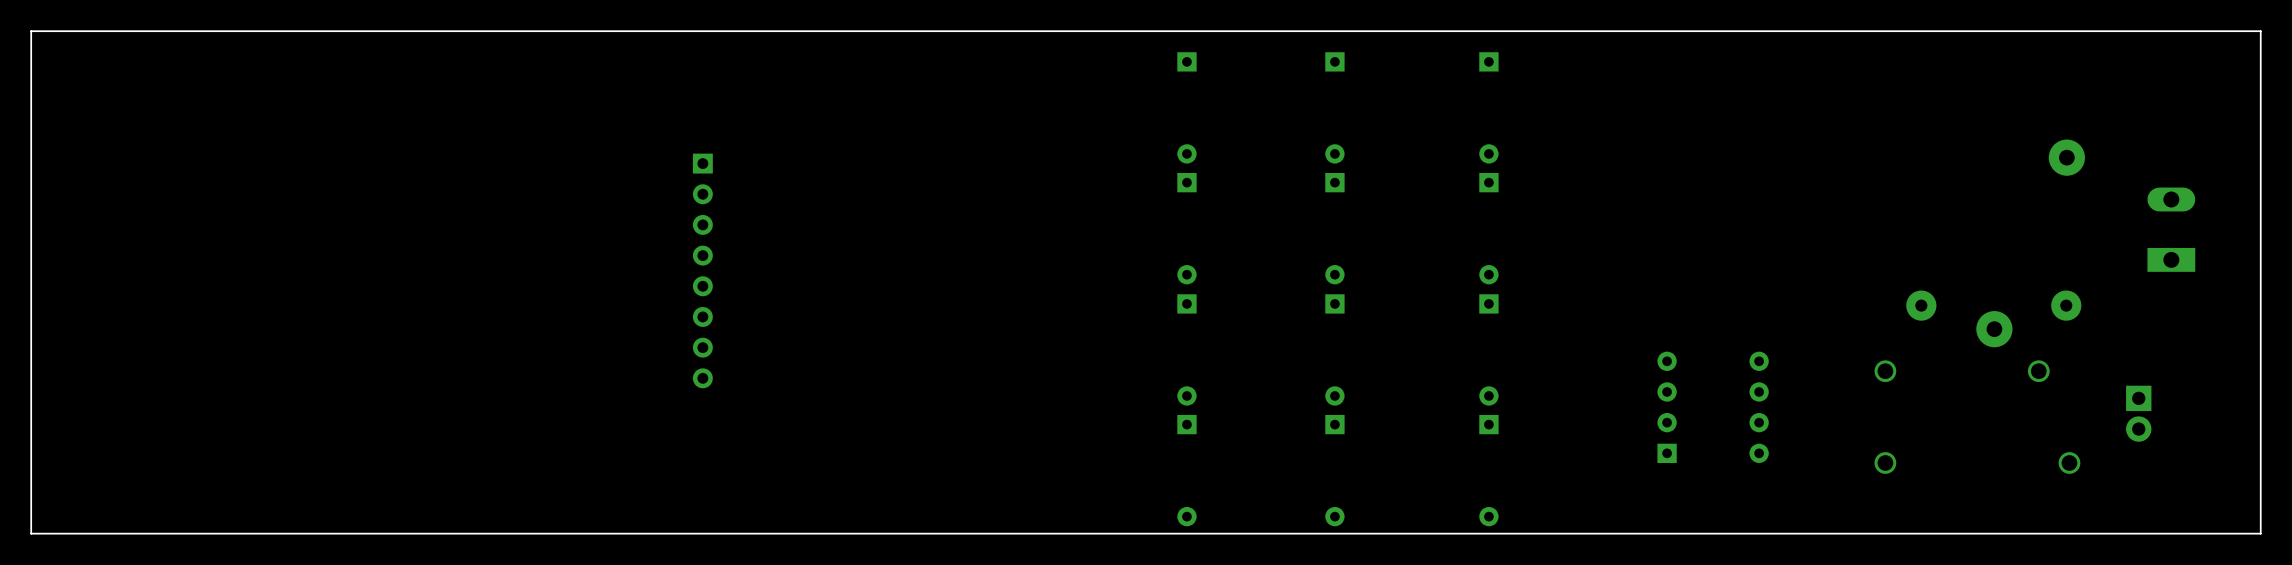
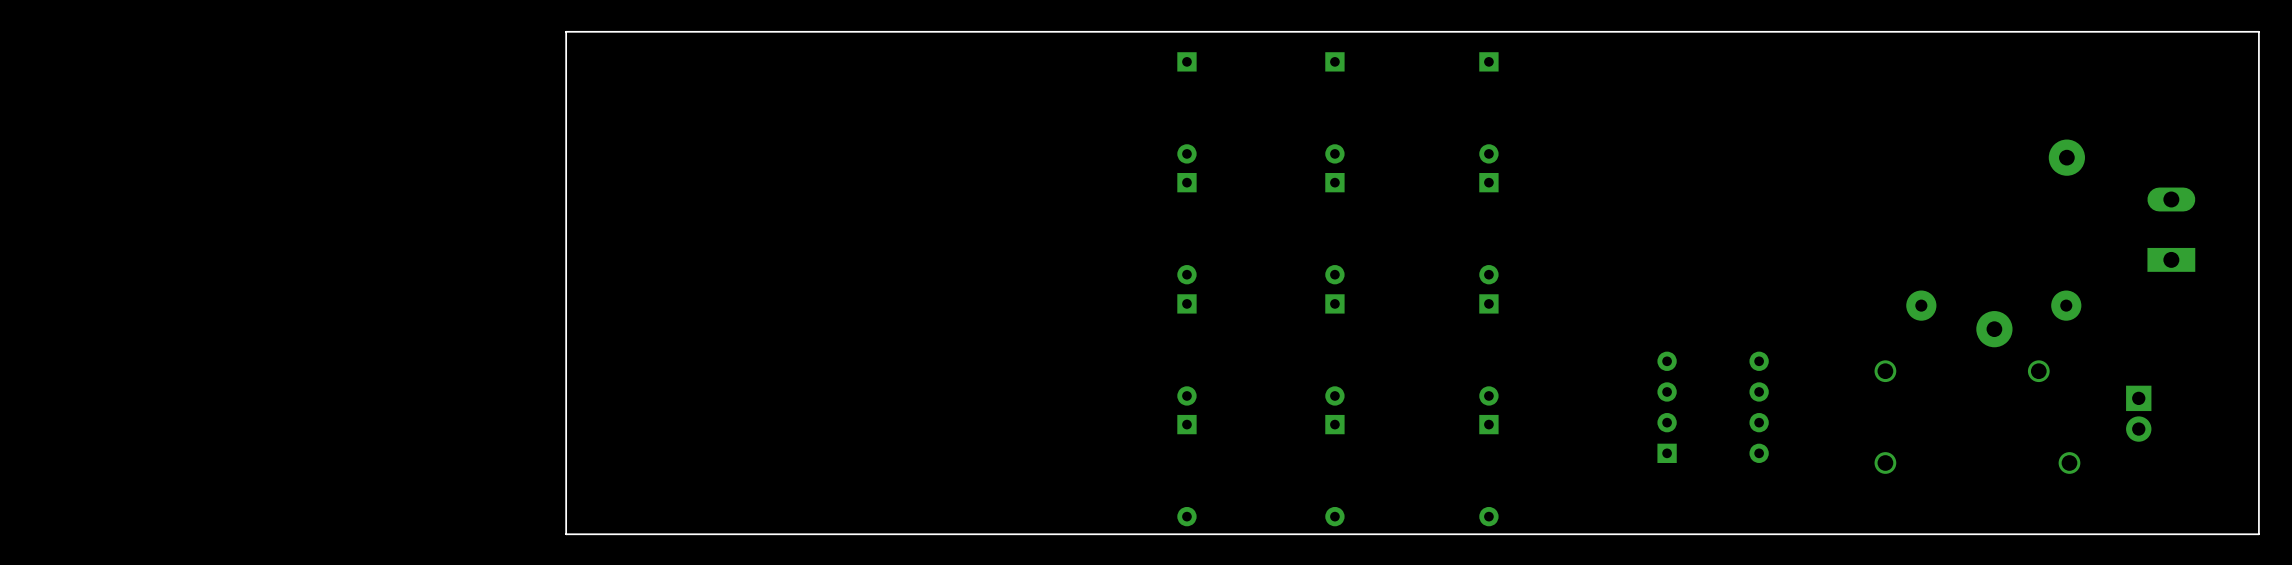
board edge: (2260, 31) (31, 31) (31, 533) (2260, 533) (2260, 31) -> (2258, 31) (2258, 534) (566, 534) (566, 31) (2258, 31)
part: (702, 270) -> none

